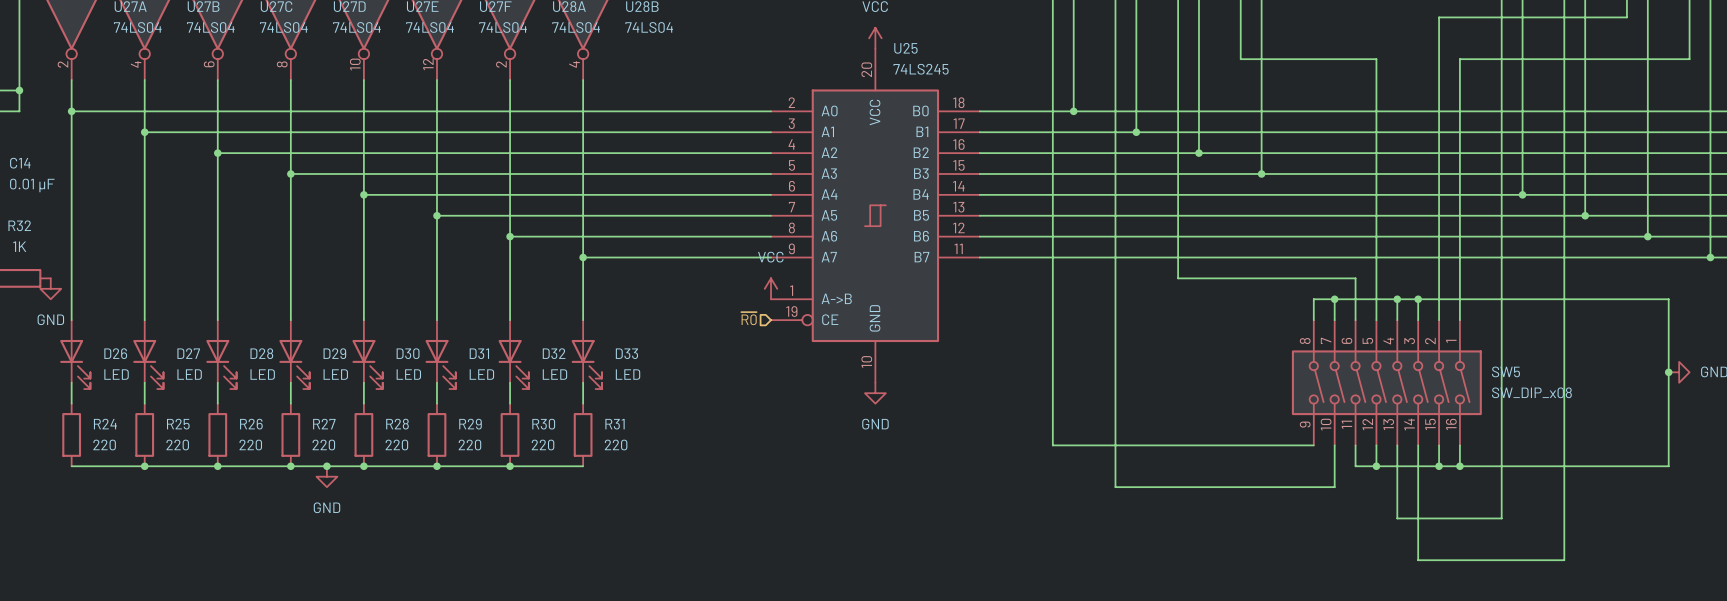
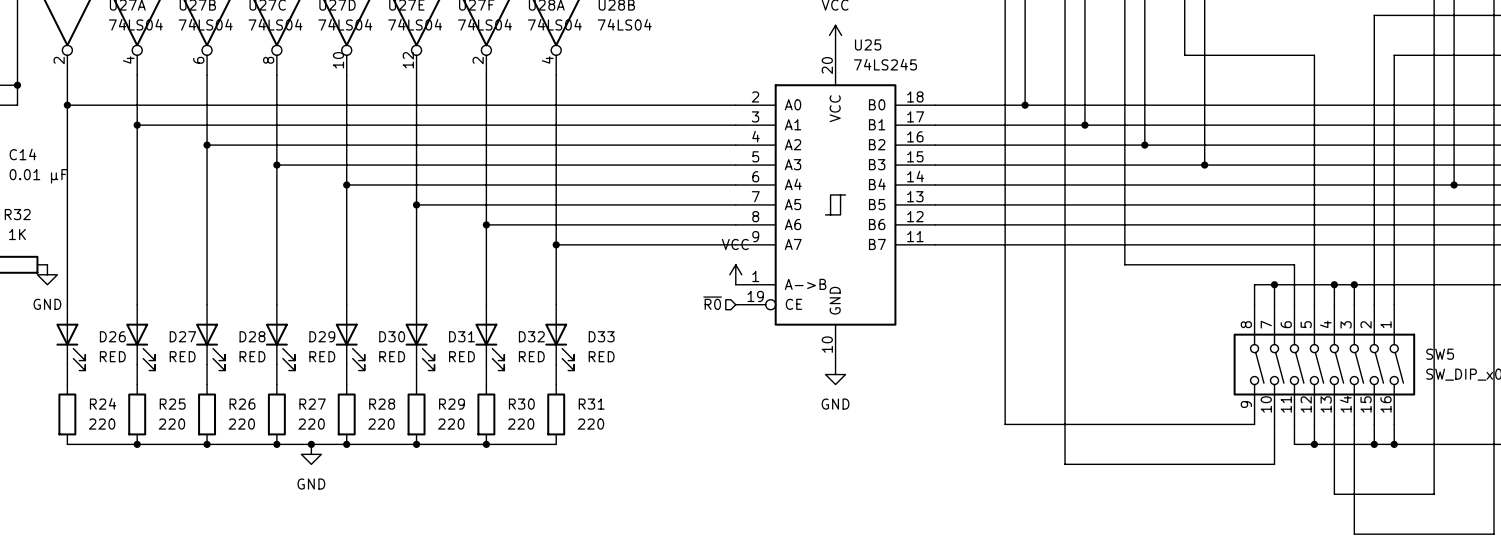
D26 value: LED (116, 374) -> RED (112, 356)
D27 value: LED (189, 374) -> RED (182, 356)
D28 value: LED (262, 374) -> RED (252, 356)
D29 value: LED (335, 374) -> RED (322, 356)
D30 value: LED (408, 374) -> RED (392, 356)
D31 value: LED (481, 374) -> RED (461, 356)
D32 value: LED (554, 374) -> RED (531, 356)
D33 value: LED (628, 374) -> RED (601, 356)

